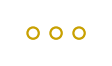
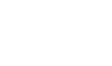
part: (56, 33) -> none

